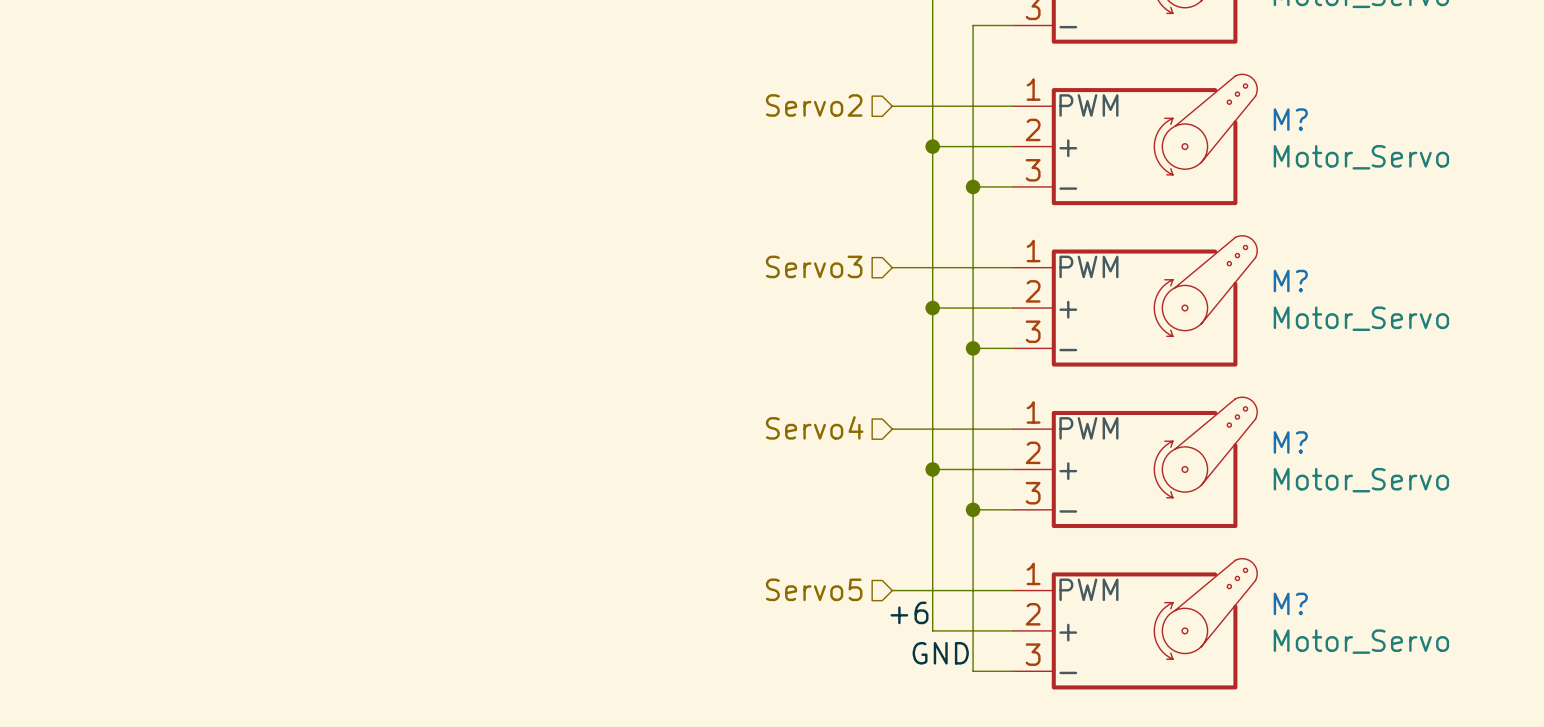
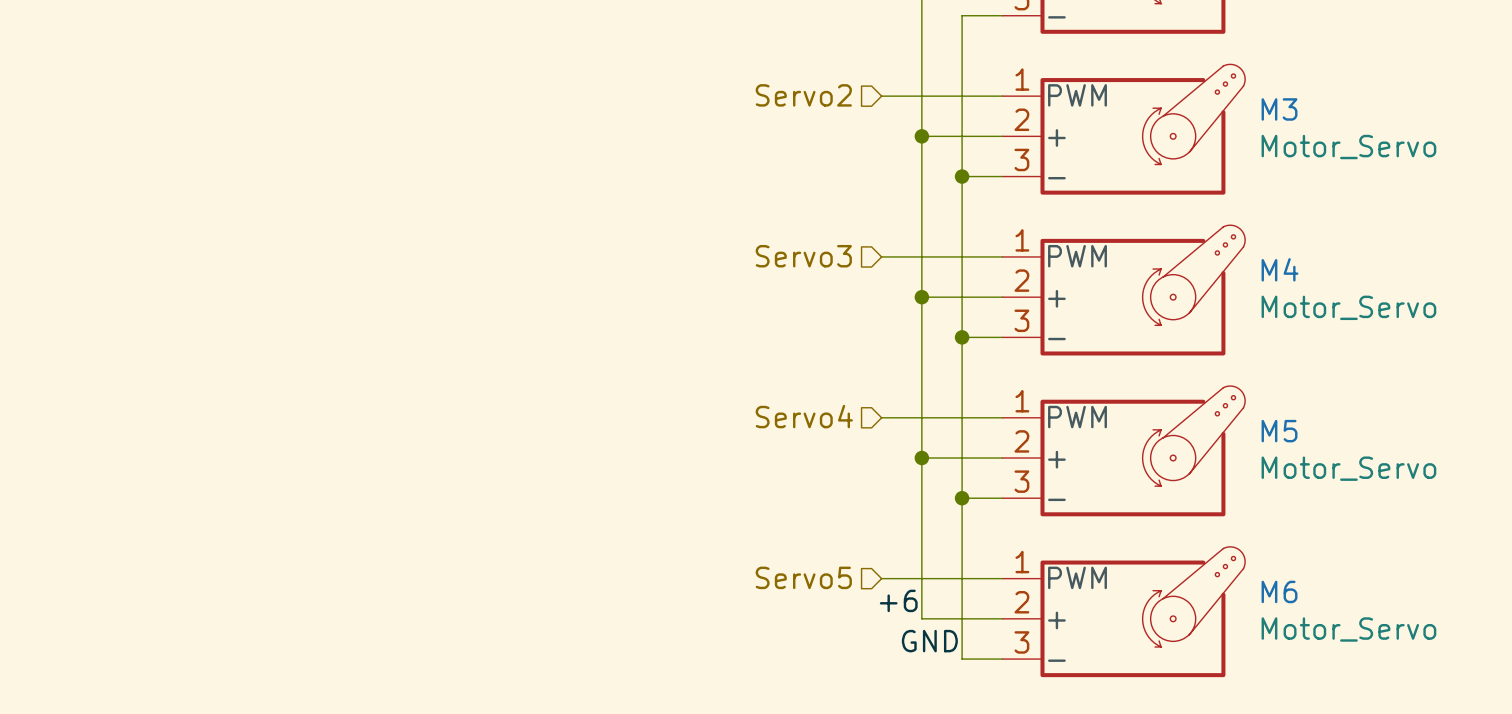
M? name: M? (1290, 119) -> M3 (1279, 109)
M? name: M? (1290, 281) -> M4 (1280, 269)
M? name: M? (1290, 442) -> M5 (1279, 431)
M? name: M? (1290, 603) -> M6 (1279, 591)

